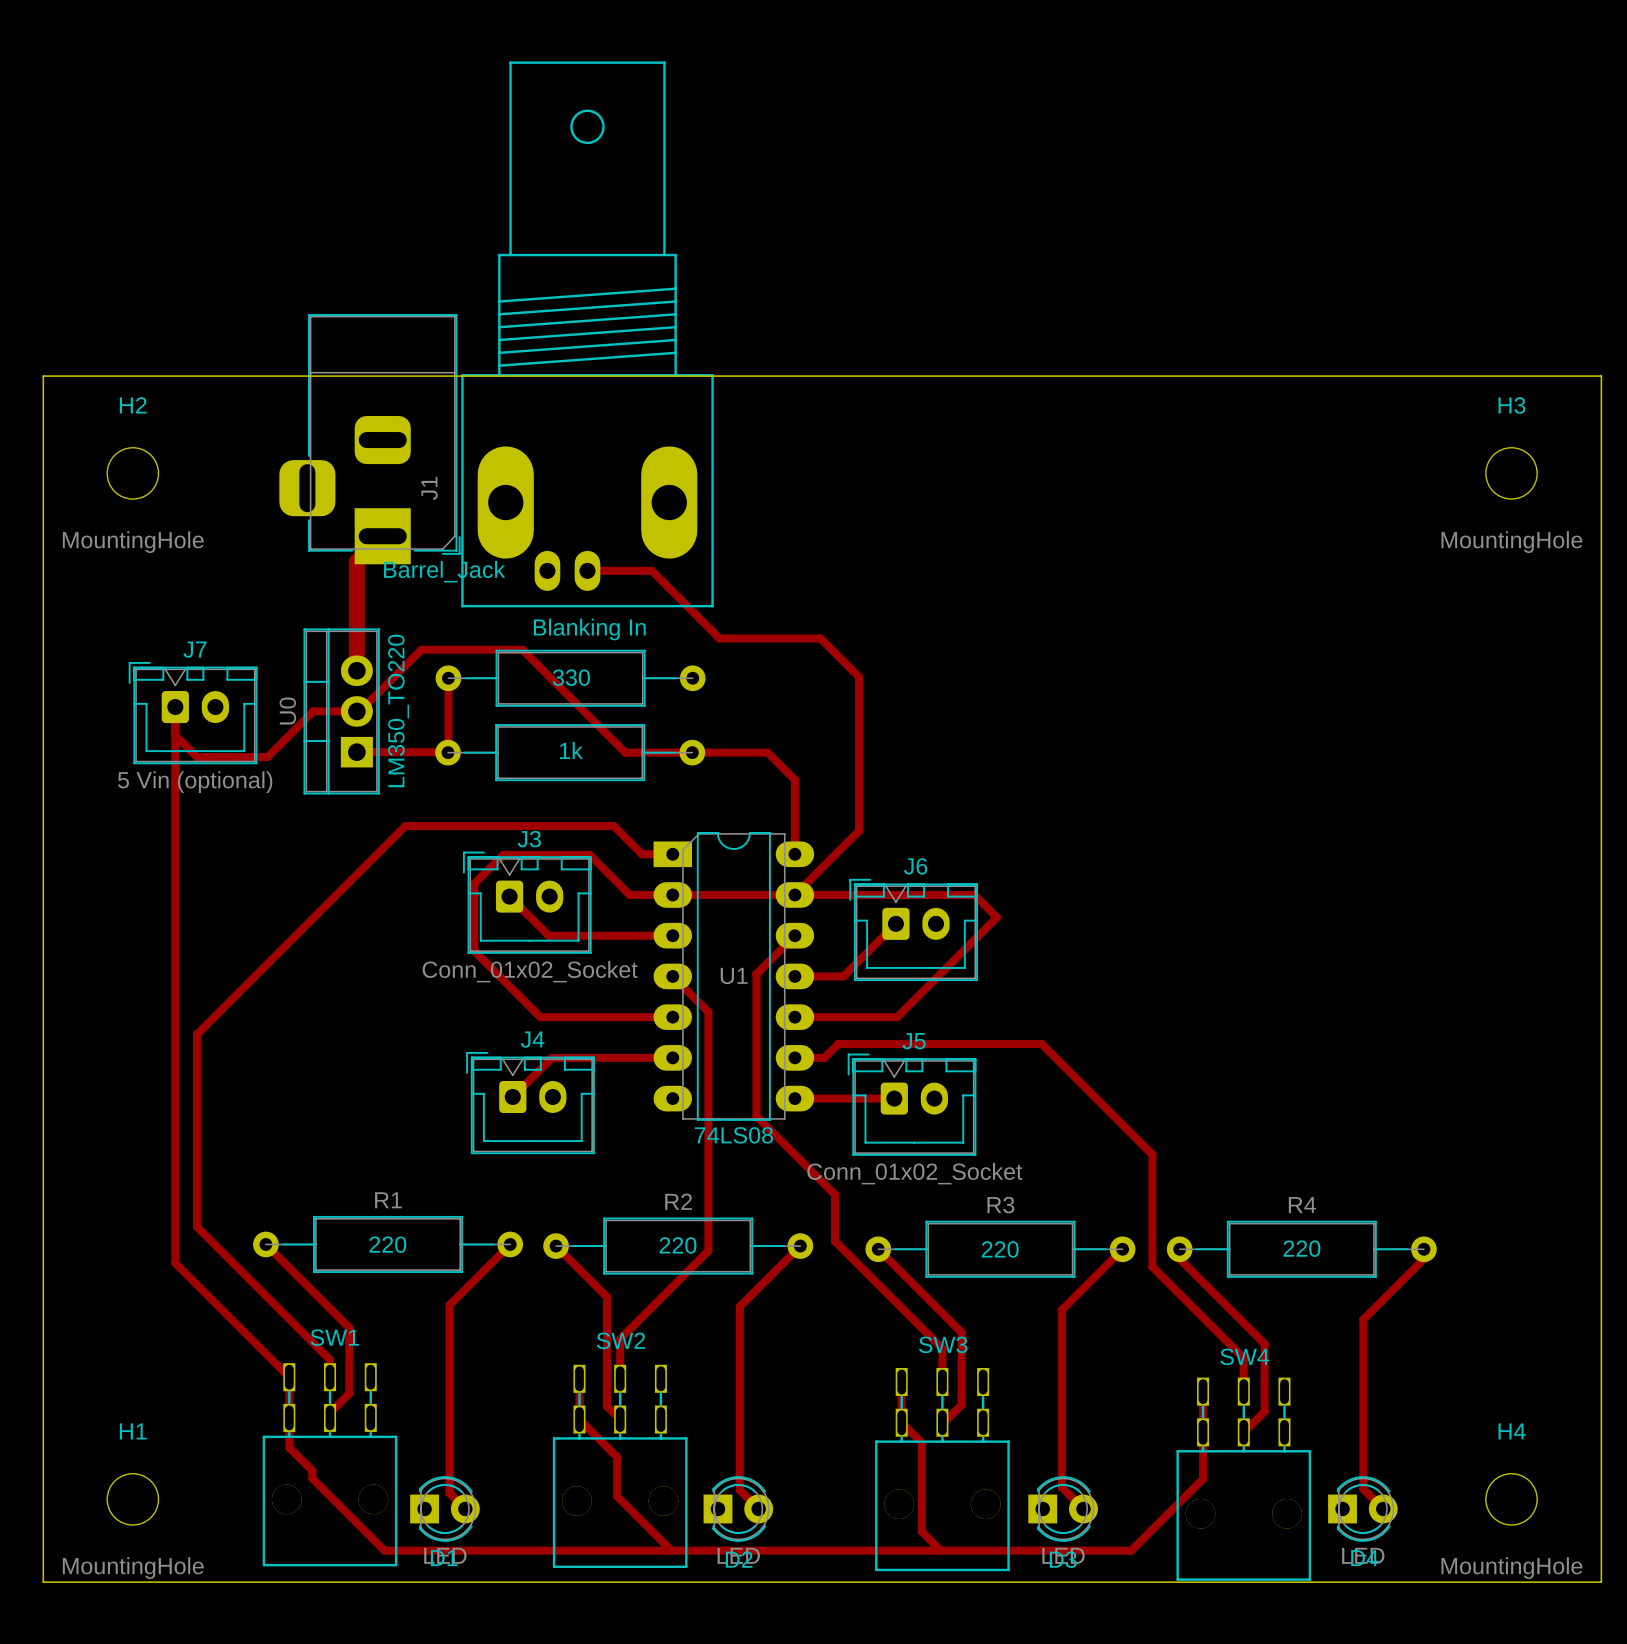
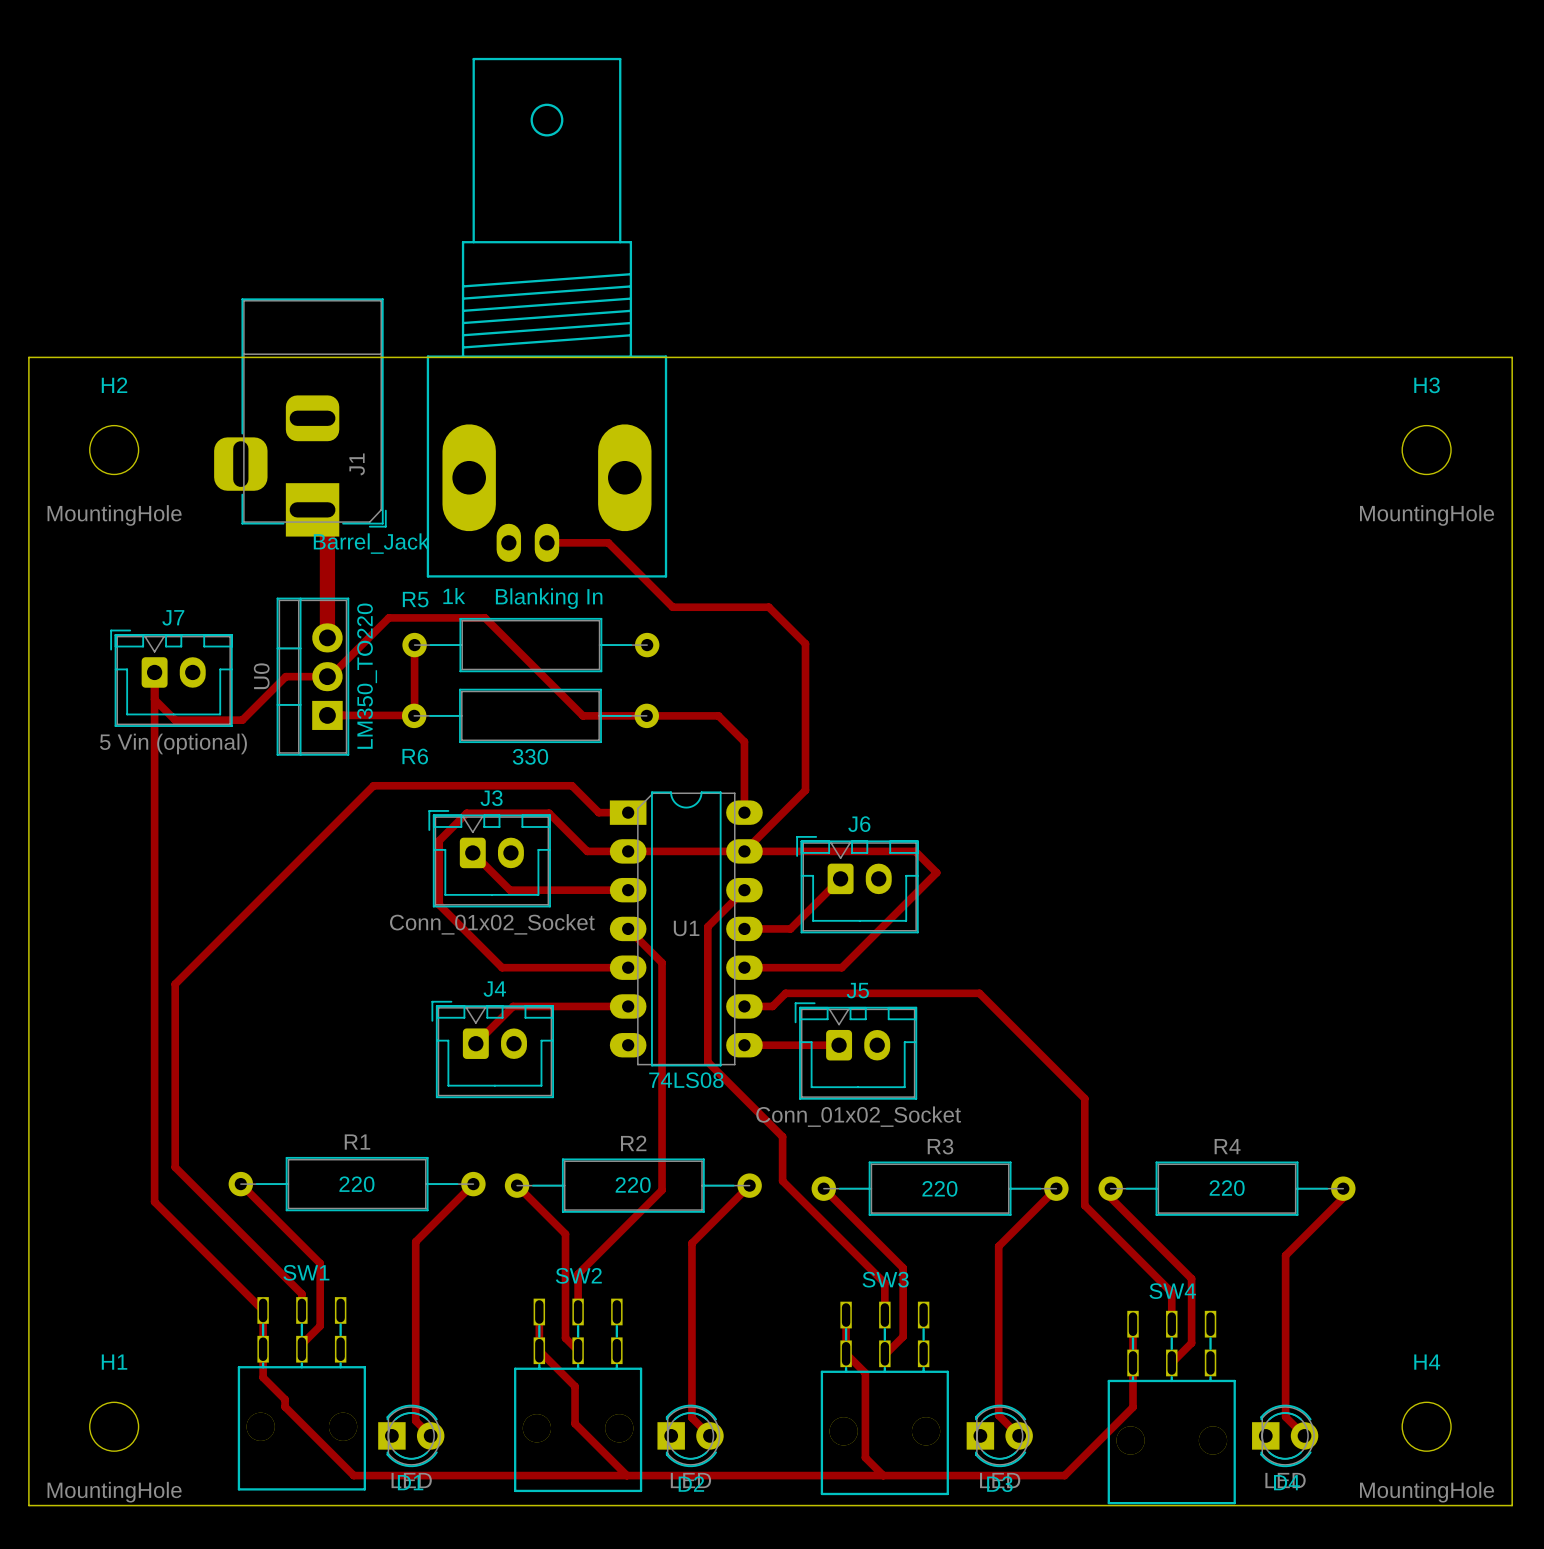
J1 position: (369, 439) -> (300, 417)
R5 name: none -> R5 (415, 599)
R5 value: 330 (571, 677) -> 1k (454, 596)
R6 value: 1k (571, 750) -> 330 (530, 756)
R6 name: none -> R6 (415, 756)

